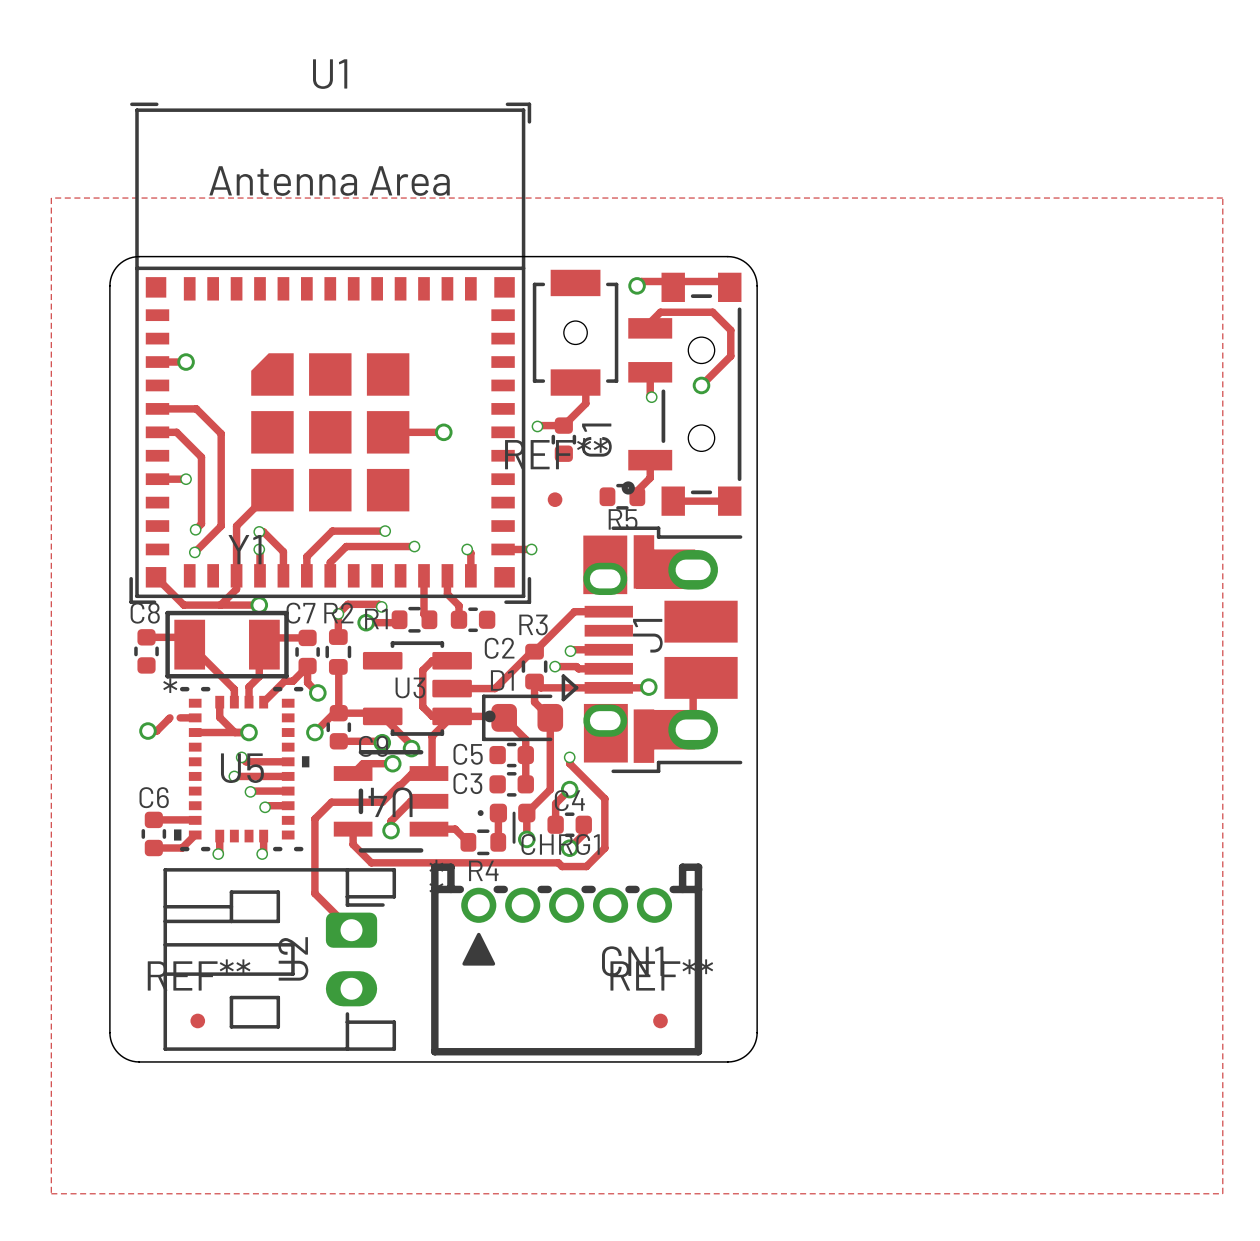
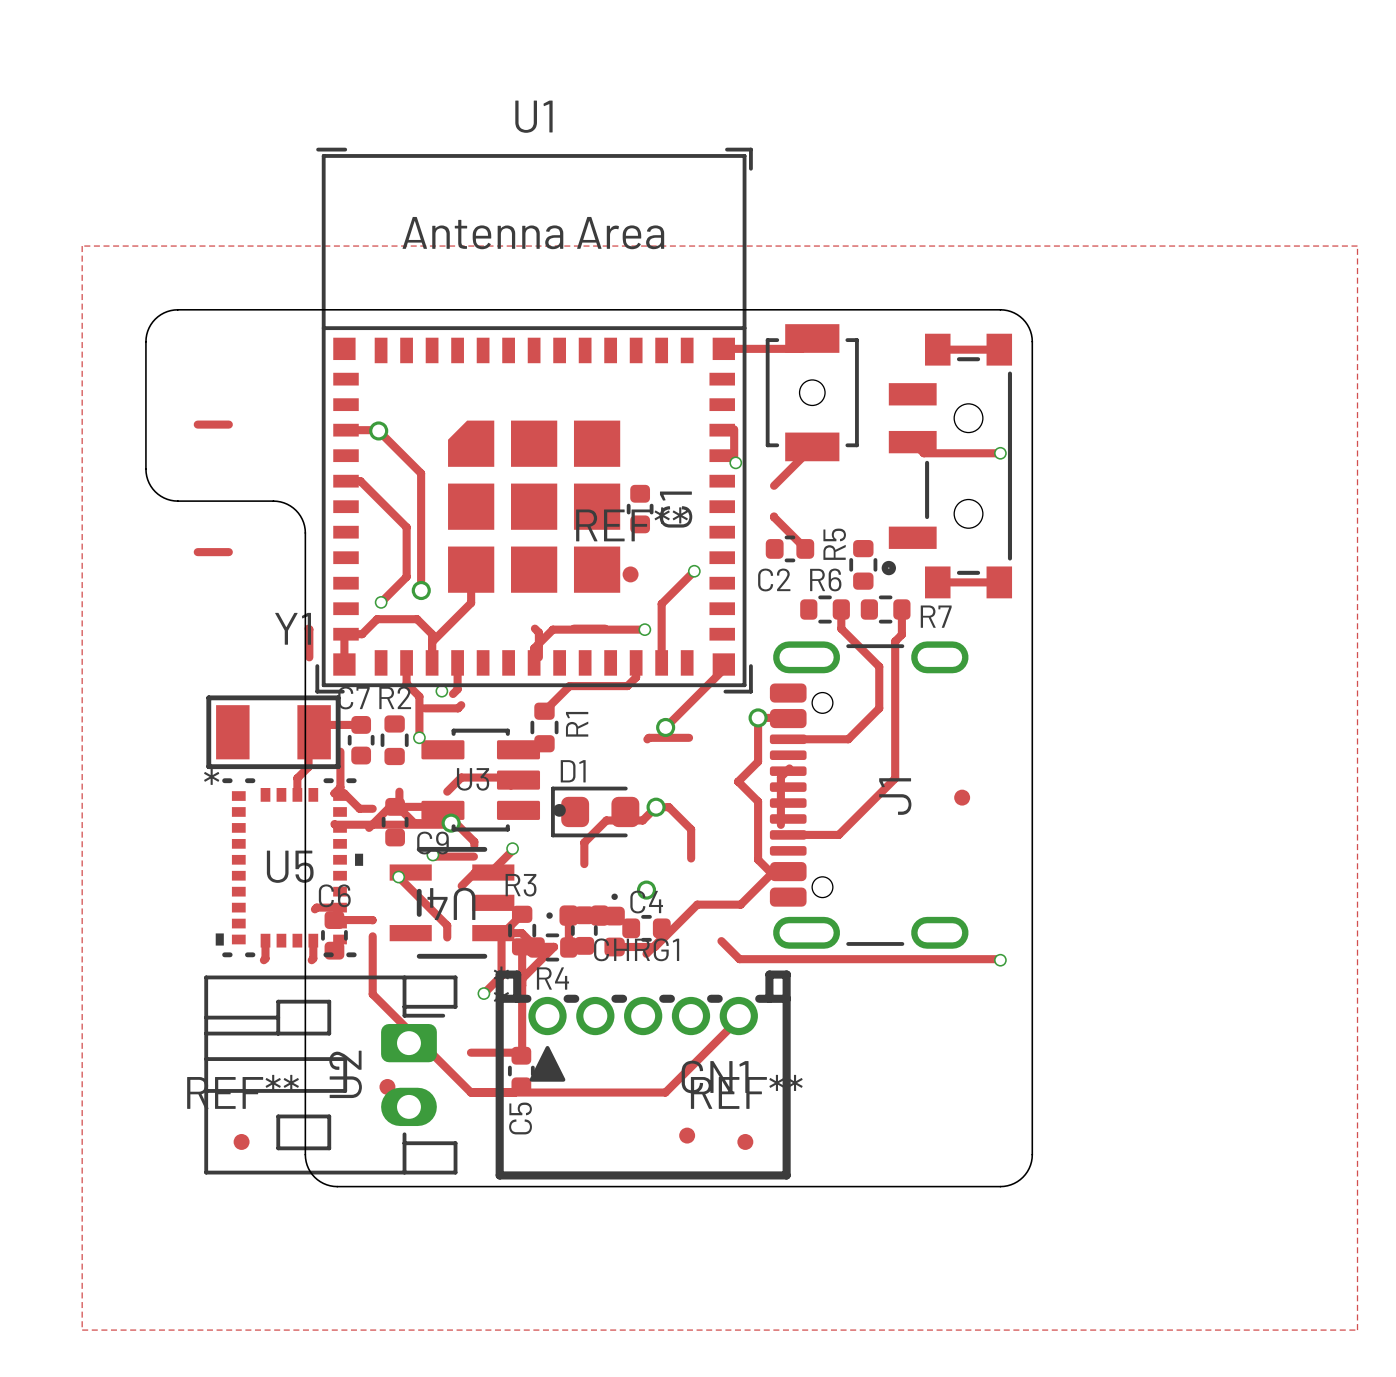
board edge: (727, 256) (737, 258) (748, 265) (755, 276) (757, 285) (757, 1032) (755, 1042) (748, 1053) (737, 1060) (727, 1061) -> (818, 309) (1003, 310) (1017, 314) (1025, 321) (1030, 331) (1032, 341) (1031, 1161) (1027, 1171) (1020, 1179) (1003, 1186) (818, 1186)
track: (729, 281) (641, 281) (637, 285) -> none
track: none -> (812, 338) (801, 348) (723, 348)
via: (637, 285) -> none
track: none -> (937, 349) (999, 349)
track: (650, 322) (660, 312) (712, 312) (730, 330) (730, 356) (701, 385) -> none
part position: (575, 332) -> (812, 392)
U1 position: (330, 353) -> (534, 420)
via: (186, 362) -> none
track: none -> (346, 430) (377, 430) (421, 473) (421, 590)
via: none -> (378, 430)
track: none -> (912, 442) (923, 453) (1000, 453)
track: none -> (812, 447) (774, 485)
via: (701, 385) -> none
track: (585, 386) (585, 403) (563, 425) (537, 426) -> none
via: none -> (1000, 453)
part position: (681, 394) -> (946, 466)
board edge: (109, 403) (110, 1039) (114, 1048) (120, 1055) (135, 1061) (285, 1061) -> (145, 469) (150, 486) (157, 494) (167, 499) (177, 501) (280, 501) (296, 510) (304, 525) (305, 1154) (307, 1165) (314, 1177) (323, 1183) (337, 1186)
track: (157, 408) (196, 408) (221, 433) (221, 526) (194, 552) -> none
track: none -> (346, 481) (360, 481) (406, 527) (406, 576) (381, 602)
via: (537, 426) -> none
track: (157, 432) (176, 432) (201, 457) (201, 523) (195, 529) -> none
track: (388, 432) (443, 432) -> none
via: (443, 432) -> none
track: none -> (774, 516) (805, 548)
track: (650, 454) (650, 478) (637, 490) -> none
via: (186, 479) -> none
track: (272, 490) (236, 526) (236, 589) (220, 605) -> none
track: none -> (471, 569) (471, 603) (432, 642)
track: none -> (694, 571) (661, 603) (661, 662)
via: none -> (694, 571)
R5 rotation: 0° (622, 496) -> 90° clockwise (863, 564)
R5 position: (622, 496) -> (863, 564)
track: (673, 501) (729, 501) -> (937, 582) (999, 582)
via: none -> (421, 590)
via: none -> (381, 602)
J1 footprint: [561, 526, 743, 774] -> [769, 641, 969, 949]
via: (195, 529) -> none
track: (259, 531) (263, 531) (283, 551) (283, 575) -> none
via: (259, 531) -> none
track: (385, 531) (332, 531) (306, 556) (306, 575) -> none
via: (385, 531) -> none
R6: none -> (825, 609)
track: none -> (841, 609) (841, 628) (879, 666) (879, 708) (848, 739) (788, 739)
R7: none -> (885, 609)
track: none -> (901, 609) (901, 634) (895, 641) (895, 778) (838, 834) (788, 834)
track: (414, 546) (346, 546) (330, 562) (330, 575) -> none
via: (414, 546) -> none
via: (259, 549) -> none
via: (467, 549) -> none
via position: (531, 549) -> (644, 629)
track: none -> (644, 629) (552, 629) (534, 648) (534, 662)
via: (194, 552) -> none
track: (424, 575) (424, 614) (429, 619) -> none
track: (447, 575) (447, 594) (458, 605) (458, 619) -> none
track: (156, 577) (183, 605) (259, 605) -> none
track: none -> (406, 662) (406, 683) (419, 696) (419, 737)
track: none -> (432, 662) (432, 634) (417, 619) (377, 619) (362, 634) (344, 635) (344, 664)
track: none -> (457, 662) (457, 689) (453, 694)
track: none -> (636, 662) (636, 677) (627, 686) (569, 686) (544, 711)
track: none -> (723, 664) (723, 669) (665, 727)
via: (259, 605) -> none
track: (381, 606) (379, 604) (347, 604) (338, 613) (338, 637) -> none
track: (608, 611) (574, 611) (495, 688) (452, 688) -> none
via position: (338, 613) -> (419, 737)
R1 rotation: 0° (414, 619) -> 90° clockwise (544, 727)
R1 position: (414, 619) -> (544, 727)
C2 position: (473, 619) -> (789, 548)
via: (366, 622) -> none
via: none -> (758, 717)
track: none -> (788, 718) (758, 717) (758, 761) (738, 781)
track: (146, 637) (182, 637) (234, 689) (234, 702) -> none
via: none -> (665, 727)
C2 name position: C2 (499, 648) -> C2 (774, 580)
C8: (146, 651) -> none
via: (570, 651) -> none
track: (452, 660) (432, 660) (422, 670) (422, 706) (432, 716) (502, 716) (525, 739) (525, 784) -> none
track: none -> (340, 751) (340, 787) (334, 793) (344, 793) (359, 808) (372, 808)
track: (307, 666) (307, 682) (317, 692) -> none
track: (307, 666) (292, 681) (284, 681) (263, 702) -> none
track: (338, 666) (338, 713) -> none
R3 position: (534, 666) -> (522, 930)
track: (555, 666) (608, 668) -> none
via: (555, 666) -> none
track: (648, 687) (540, 687) (534, 681) (534, 702) (550, 717) (550, 789) (526, 813) (526, 839) -> none
via: (648, 687) -> none
track: none -> (738, 781) (758, 801) (758, 859) (769, 871) (788, 871)
track: none -> (512, 783) (511, 785) (503, 777) (461, 777) (447, 791)
via: (317, 692) -> none
track: none -> (399, 791) (399, 808) (414, 823) (451, 823) (449, 824) (334, 824)
track: (219, 702) (219, 717) (234, 732) -> none
part: none -> (962, 797)
via: none -> (656, 807)
track: (452, 716) (432, 736) (432, 770) (426, 773) -> (512, 848) (490, 872)
track: (169, 717) (156, 731) (147, 731) -> none
track: (180, 717) (195, 717) -> none
via: none -> (451, 823)
via: (147, 731) -> none
track: (195, 732) (249, 732) -> none
via: (249, 732) -> none
via: (314, 732) -> none
track: (338, 741) (382, 742) -> none
via: (382, 742) -> none
via: (411, 748) -> none
via: none -> (512, 848)
C5 name position: C5 (468, 754) -> C5 (520, 1118)
C5 rotation: 0° (511, 755) -> 90° clockwise (521, 1071)
C5 position: (511, 755) -> (521, 1071)
track: (241, 757) (246, 761) (288, 761) -> none
via: (241, 757) -> none
track: none -> (432, 855) (434, 856) (473, 856)
via: none -> (432, 855)
track: (569, 757) (569, 763) (604, 798) (604, 848) (586, 866) (562, 866) (558, 862) (371, 862) (353, 844) (353, 829) -> none
via: (569, 757) -> none
track: none -> (691, 858) (691, 829) (668, 807) (656, 807) (642, 820) (606, 820) (584, 842) (584, 864)
track: (392, 763) (362, 763) (353, 773) -> none
via: (392, 763) -> none
track: none -> (773, 871) (740, 904) (697, 904) (654, 946) (614, 946)
track: (234, 776) (288, 776) -> none
via: (234, 776) -> none
track: none -> (398, 877) (447, 925) (447, 937)
via: none -> (398, 877)
C3: (511, 784) -> none
track: (399, 785) (382, 802) (331, 802) (314, 818) (314, 893) (351, 930) -> none
track: (569, 789) (555, 803) (555, 824) -> none
via: (250, 791) -> none
track: (288, 791) (250, 791) -> none
track: (428, 801) (410, 801) (391, 821) (391, 830) -> none
via: (265, 807) -> none
track: none -> (522, 914) (501, 934) (501, 975) (483, 993)
line: (514, 813) (514, 842) -> none
track: none -> (334, 920) (372, 920)
track: (153, 819) (195, 820) -> none
part: none -> (614, 924)
part: none -> (584, 930)
via: (391, 830) -> none
track: none -> (372, 936) (372, 994) (470, 1092) (665, 1092) (737, 1020)
C6 position: (153, 833) -> (334, 935)
track: (195, 835) (182, 848) (153, 848) -> none
track: none -> (721, 941) (739, 959) (1000, 960)
via: (526, 839) -> none
track: none -> (553, 946) (522, 946) (522, 1054) (518, 1052) (470, 1052)
track: none -> (554, 946) (522, 978)
via: (569, 848) -> none
via: (218, 854) -> none
via: (262, 854) -> none
via: none -> (1000, 960)
via: none -> (483, 993)
part: none -> (387, 1086)
part: none -> (687, 1135)

